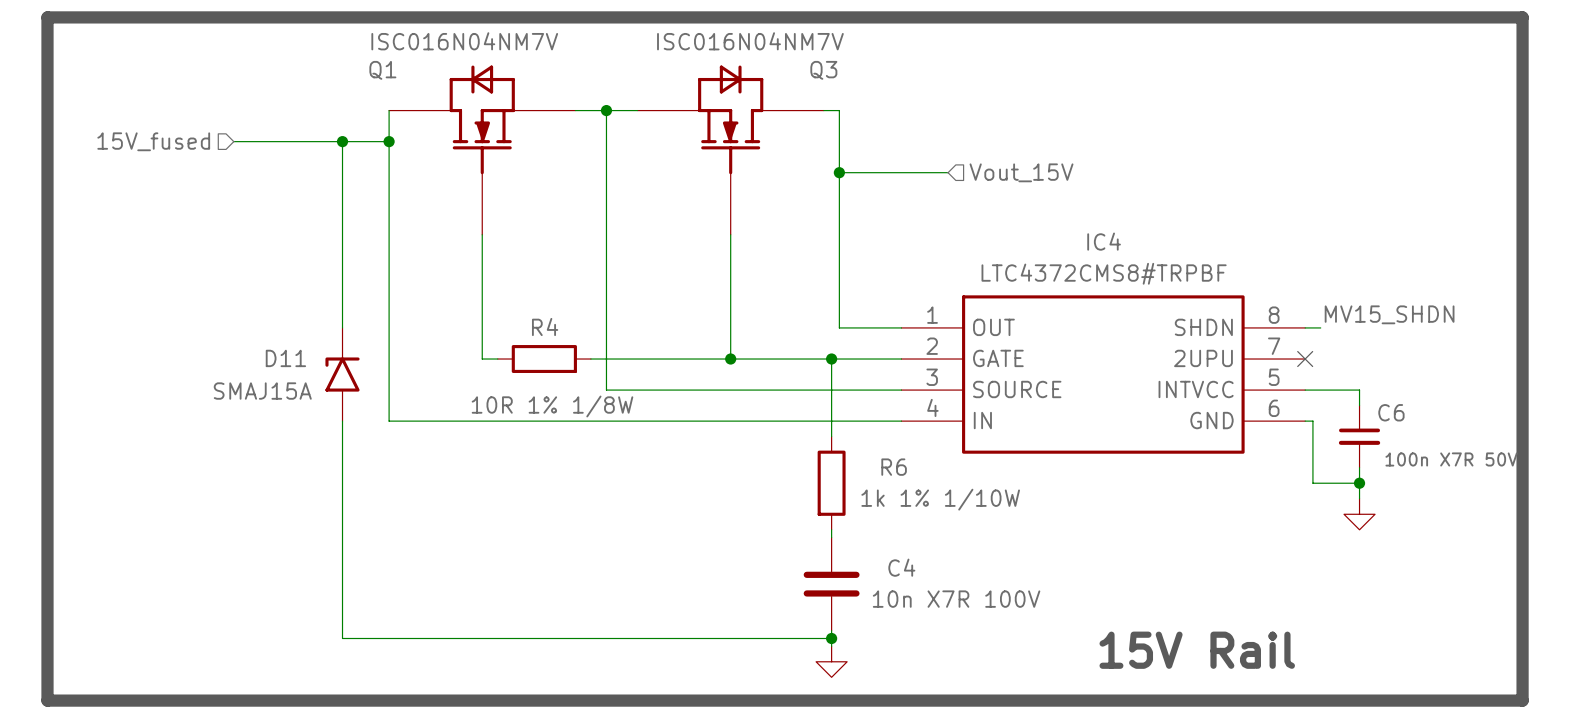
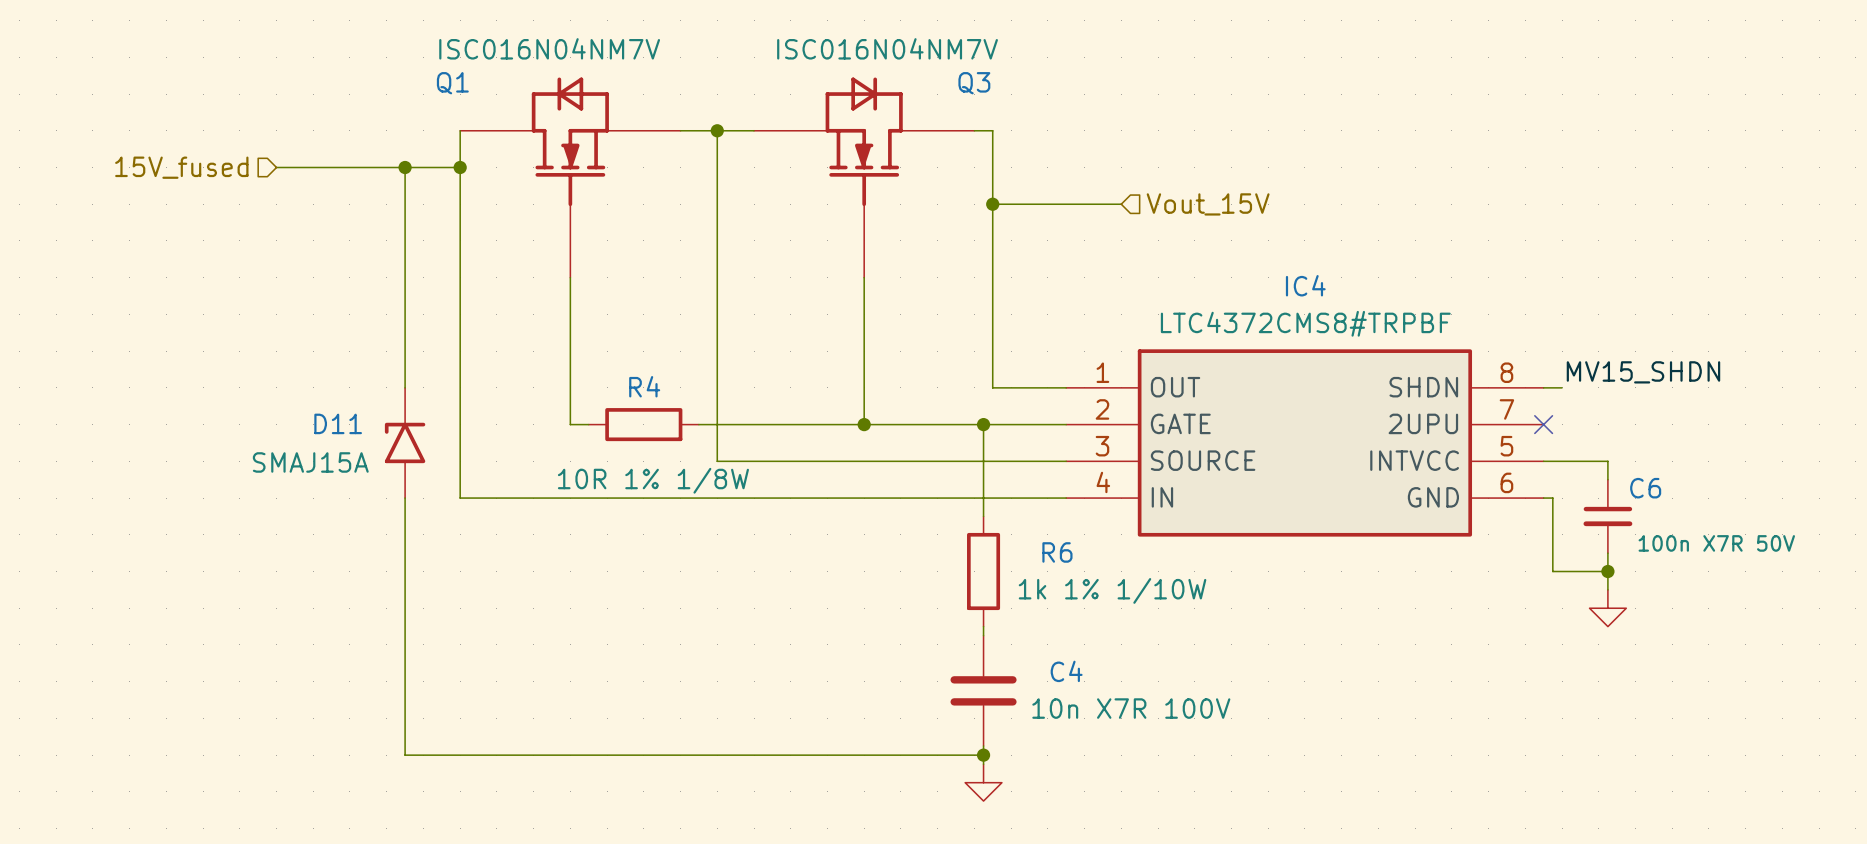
line: (47, 17) (1522, 17) (1522, 700) (47, 700) (47, 17) -> none
text: 15V Rail (1197, 650) -> none

